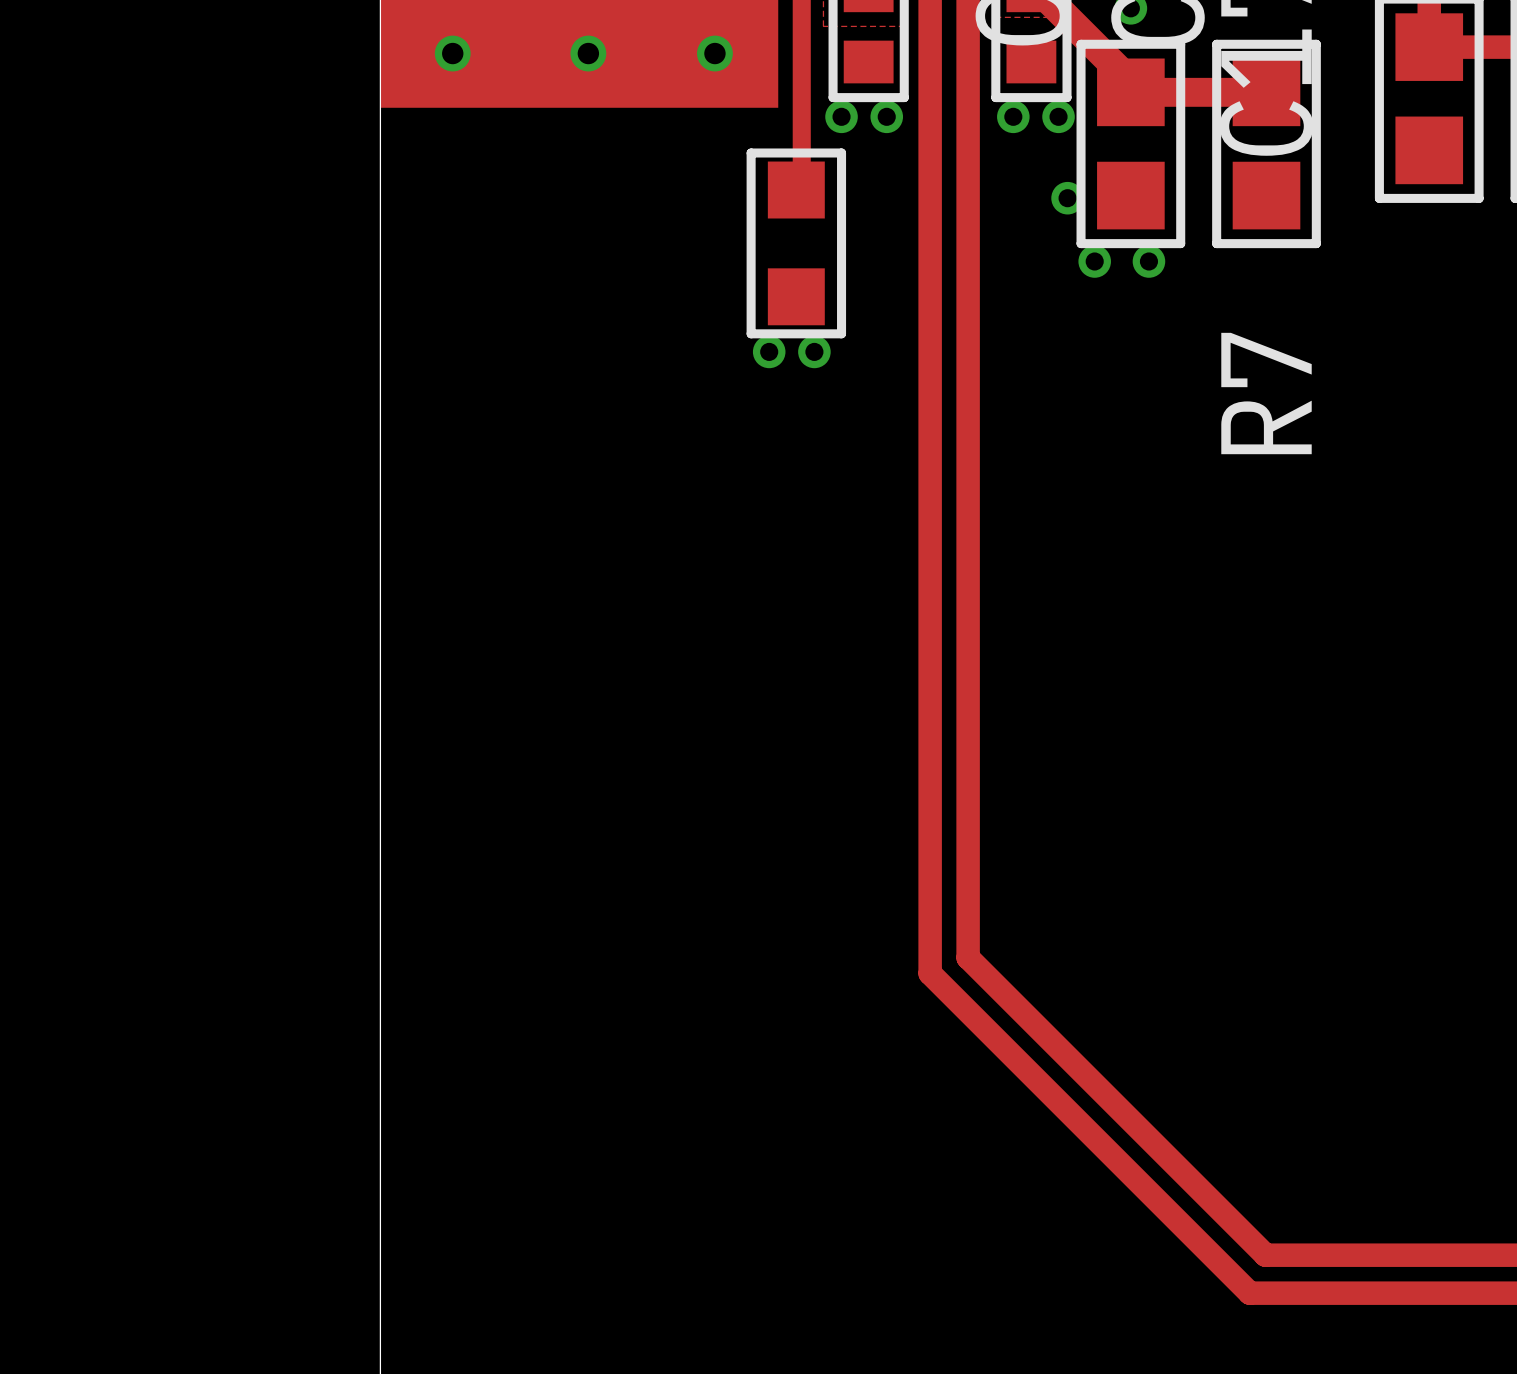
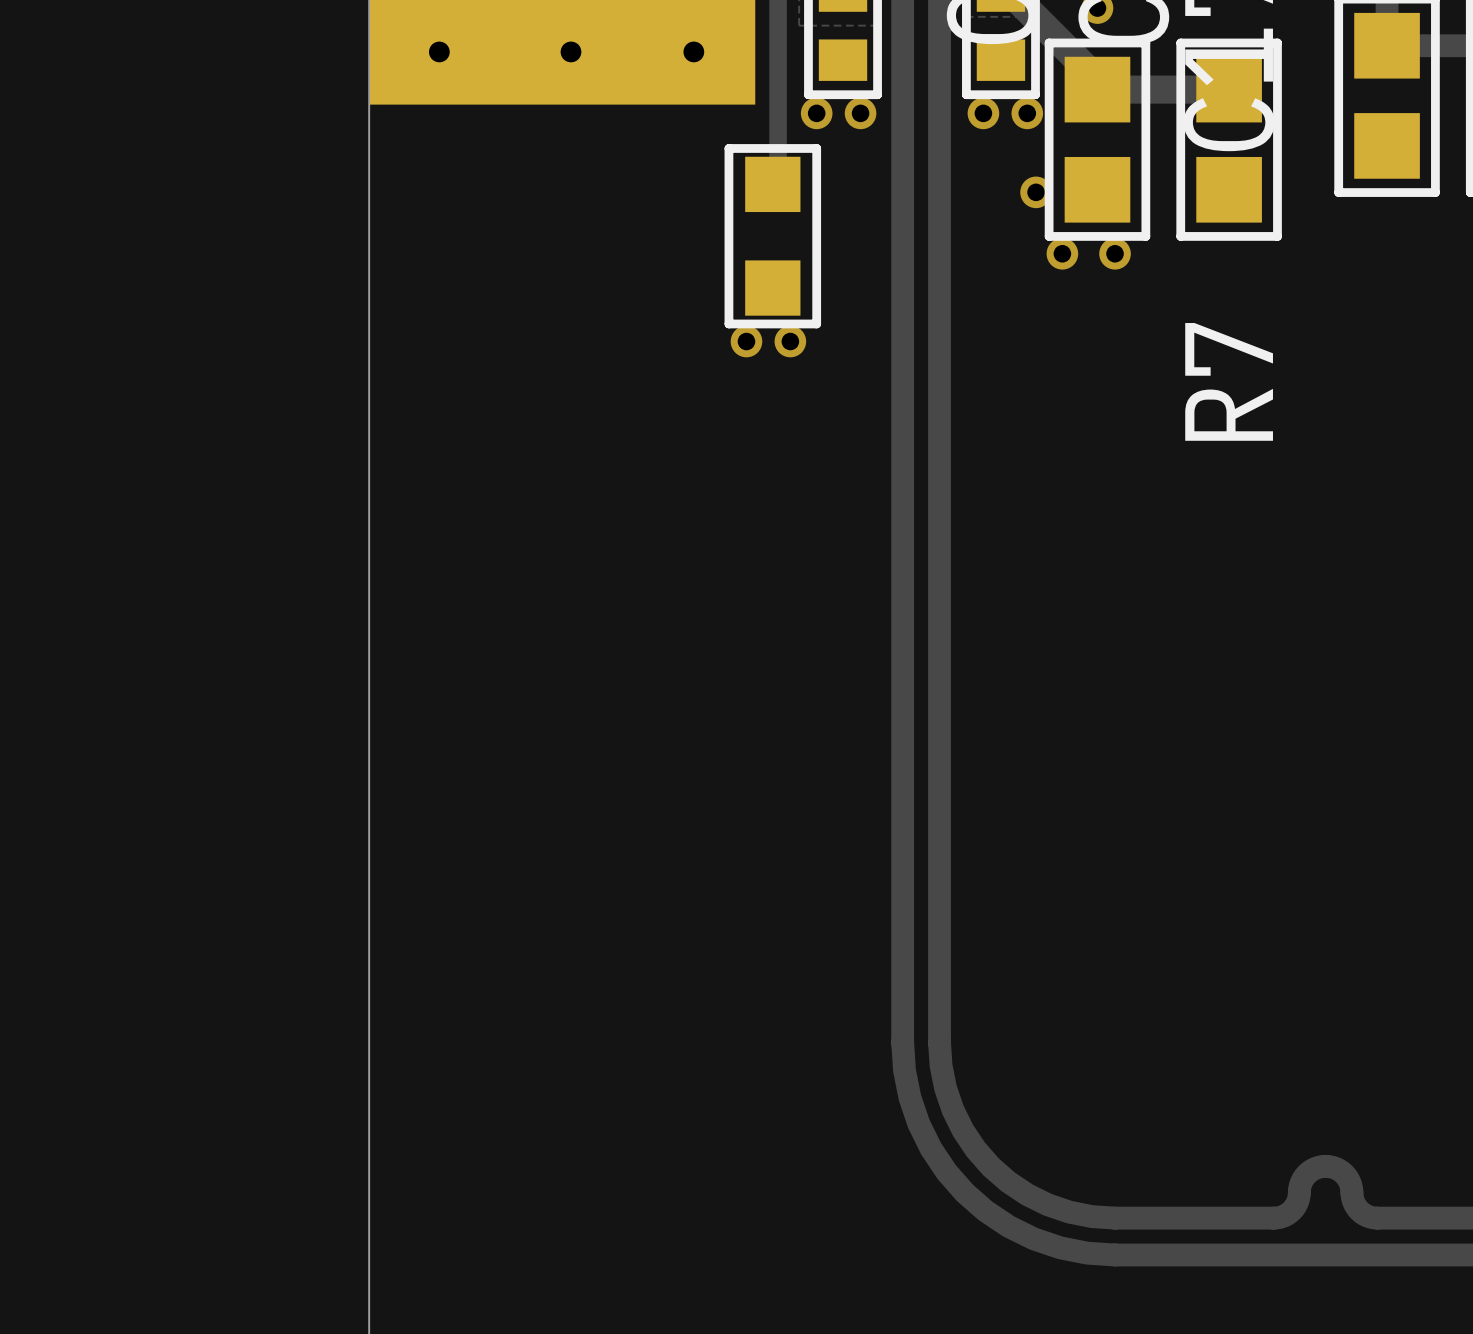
track: (968, 957) (1265, 1255) -> (939, 929) (939, 1042) (941, 1065) (945, 1088) (952, 1109) (963, 1130) (975, 1149) (990, 1166) (1008, 1181) (1027, 1194) (1047, 1204) (1069, 1212) (1092, 1216) (1115, 1218) (1228, 1218)
track: (930, 973) (1249, 1293) -> (902, 944) (902, 1042) (904, 1070) (909, 1097) (918, 1123) (931, 1148) (946, 1171) (964, 1192) (985, 1211) (1008, 1226) (1033, 1238) (1060, 1247) (1087, 1253) (1115, 1254) (1212, 1254)
track: (1312, 1255) (1419, 1255) -> (1273, 1218) (1286, 1214) (1294, 1208) (1298, 1199) (1301, 1182) (1307, 1174) (1315, 1168) (1325, 1166) (1335, 1168) (1344, 1174) (1349, 1182) (1352, 1199) (1357, 1208) (1364, 1214) (1377, 1218)

